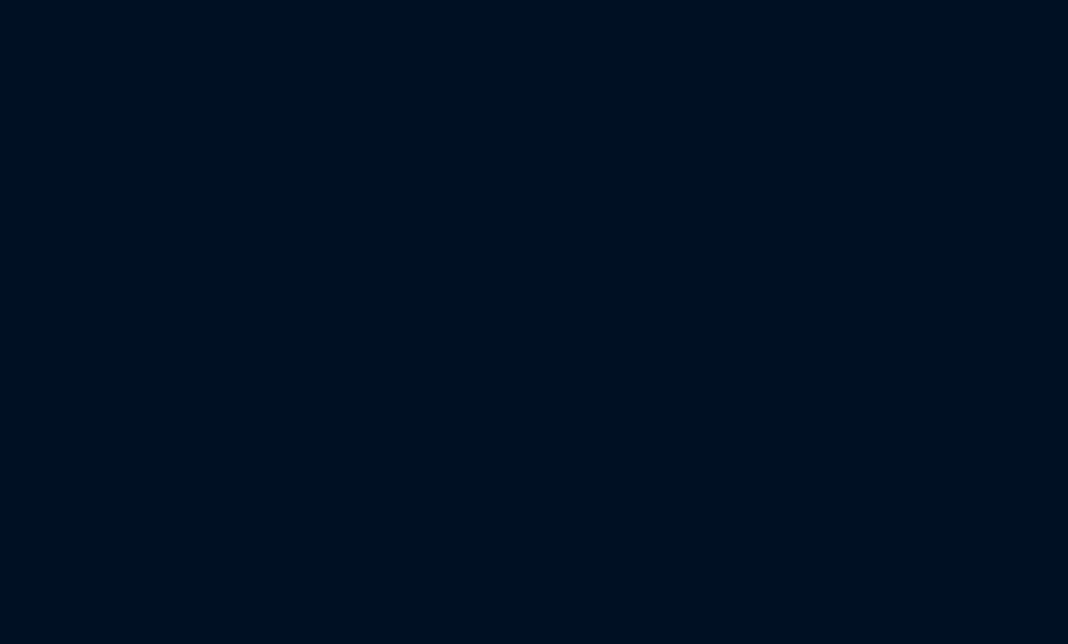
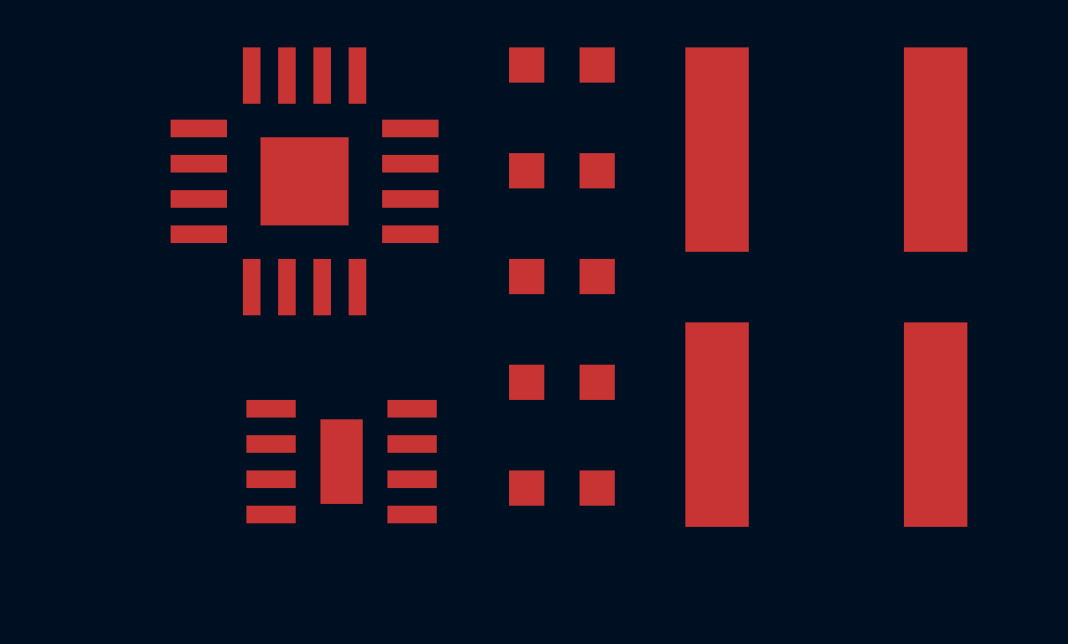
part: none -> (561, 64)
part: none -> (826, 149)
part: none -> (561, 170)
part: none -> (304, 181)
part: none -> (561, 276)
part: none -> (561, 382)
part: none -> (826, 424)
part: none -> (341, 461)
part: none -> (561, 488)

